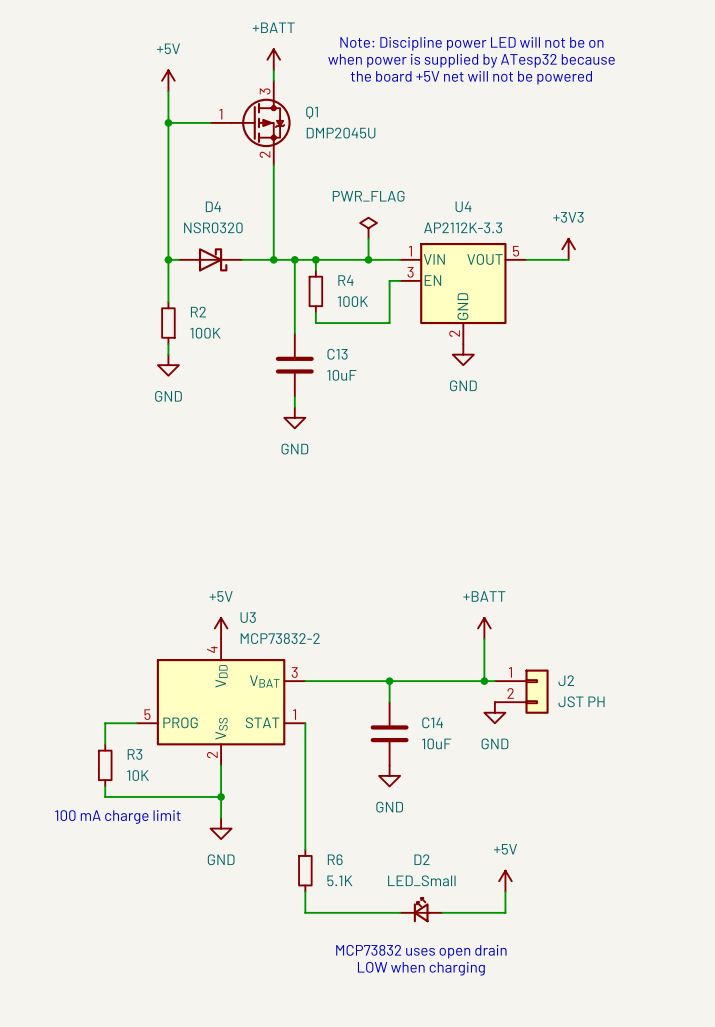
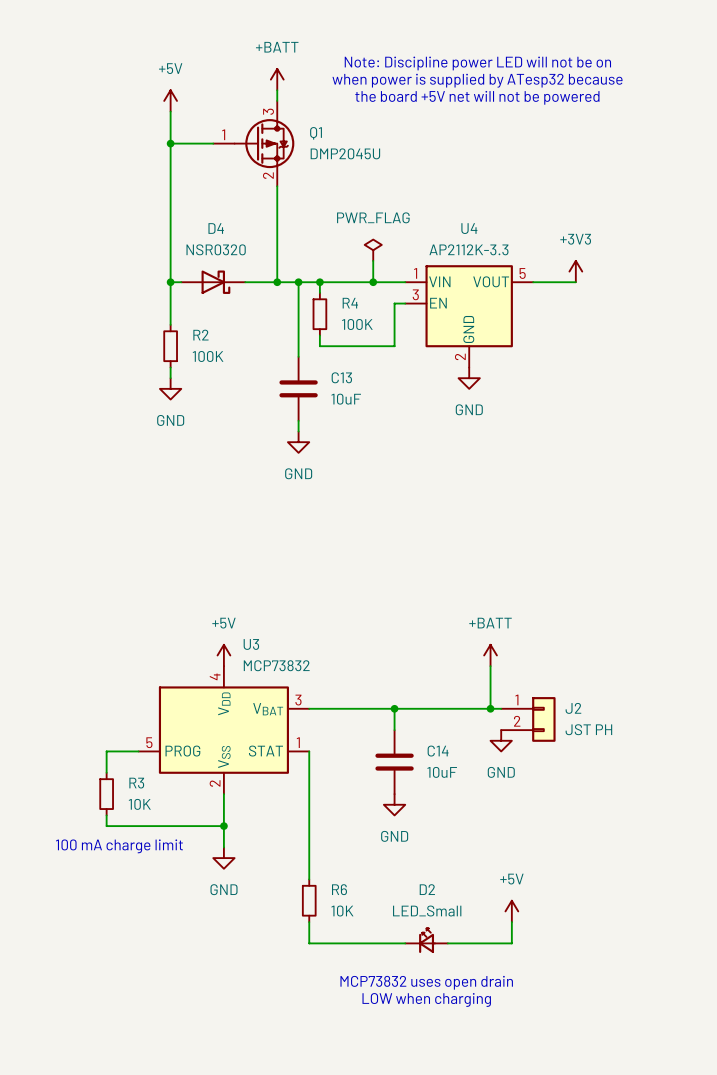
U3 value: MCP73832-2 (280, 638) -> MCP73832 (276, 665)
R6 value: 5.1K (339, 880) -> 10K (342, 911)

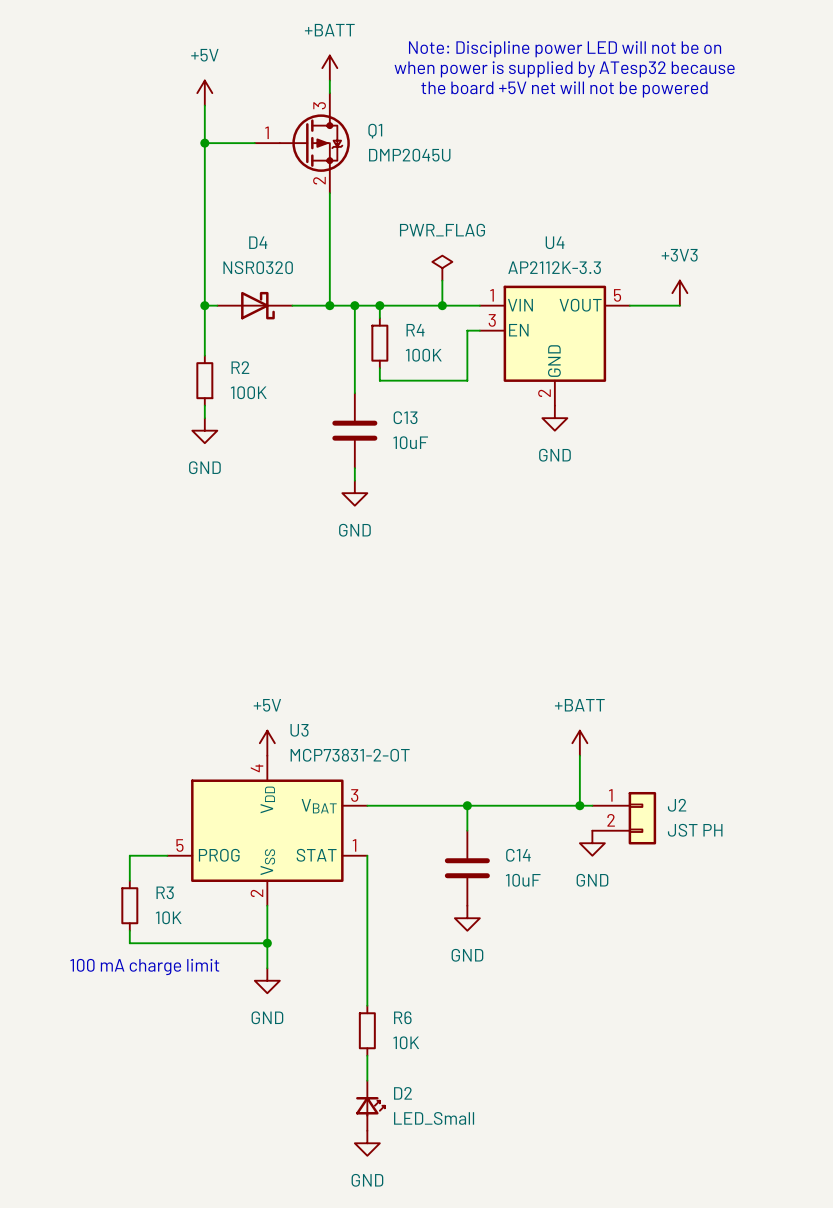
U3 value: MCP73832 (276, 665) -> MCP73831-2-OT (350, 755)
D2 name position: D2 (427, 889) -> D2 (402, 1093)
D2 value position: LED_Small (427, 911) -> LED_Small (434, 1118)
power symbol: +5V (511, 911) -> none
wire: (511, 922) (511, 943) (447, 943) -> none
D2 position: (426, 940) -> (370, 1105)
D2 rotation: 0° (427, 940) -> 90° clockwise (370, 1106)
wire: (309, 943) (405, 943) -> none
text: MCP73832 uses open drain (426, 982) -> none
power symbol: none -> GND (367, 1143)
text: LOW when charging (426, 999) -> none

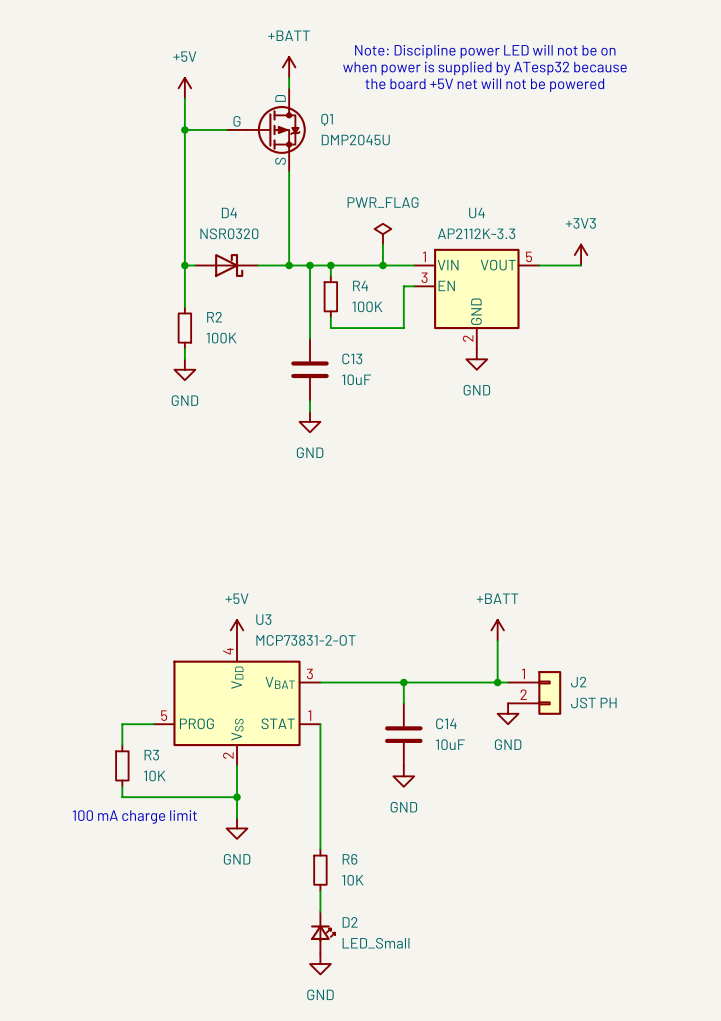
Q1 pin name: none -> D (280, 98)
Q1 pin number: 3 (319, 105) -> none
Q1 pin name: none -> G (237, 121)
Q1 pin number: 1 (267, 132) -> none
Q1 pin name: none -> S (280, 161)
Q1 pin number: 2 (319, 180) -> none

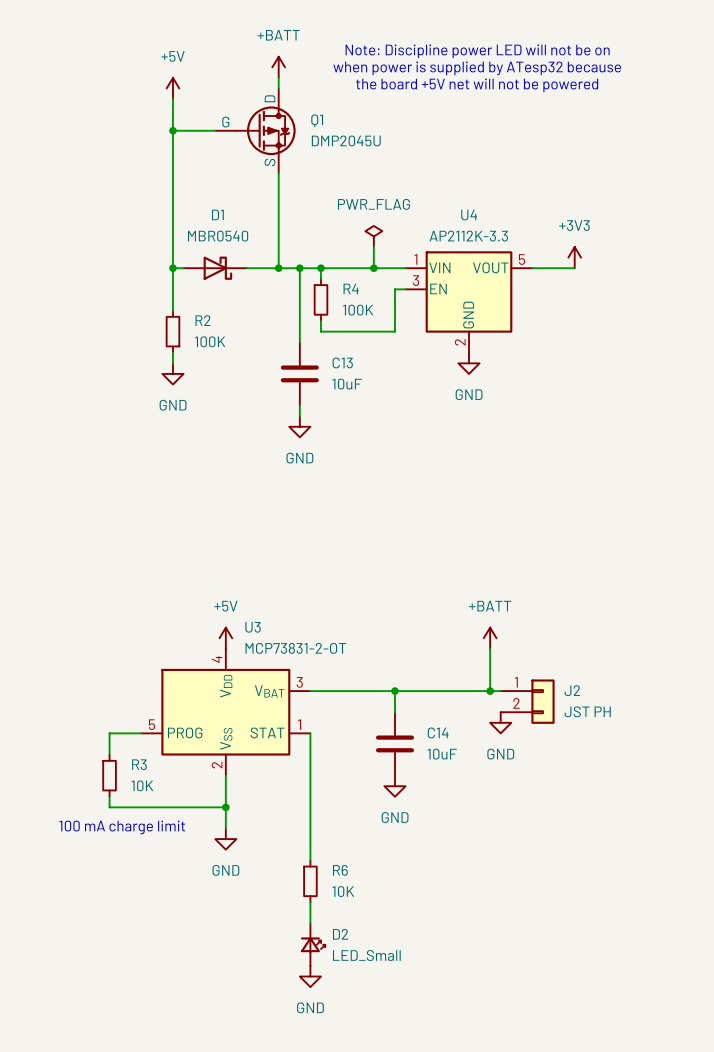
D4 name: D4 (229, 212) -> D1 (217, 214)
D4 value: NSR0320 (229, 233) -> MBR0540 (218, 236)

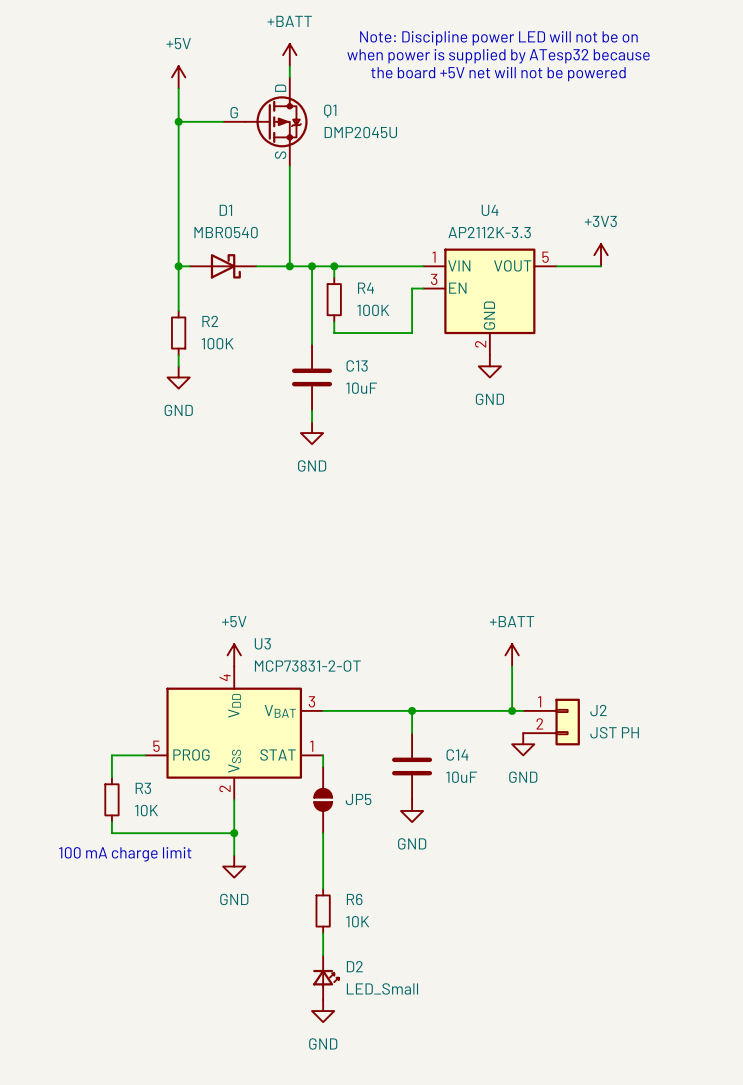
power symbol: PWR_FLAG (373, 236) -> none
wire: (373, 247) (373, 268) -> none
junction: (373, 268) -> none
JP5: none -> (323, 799)

